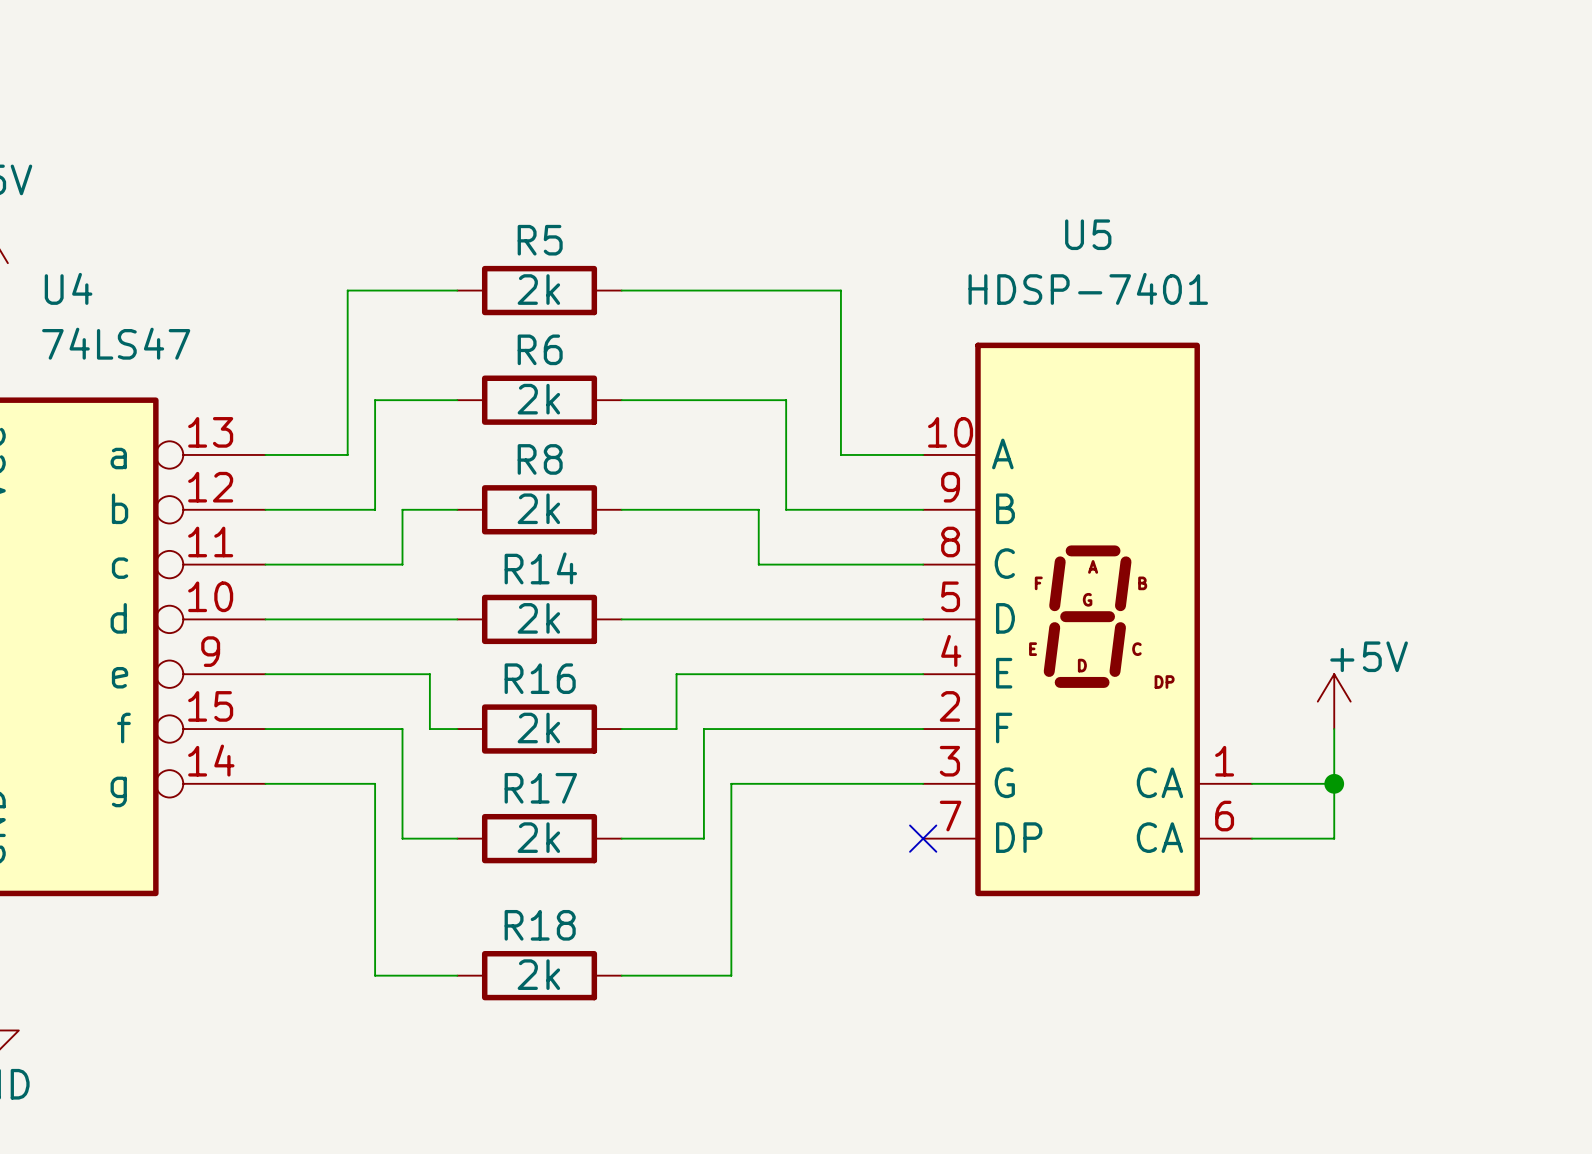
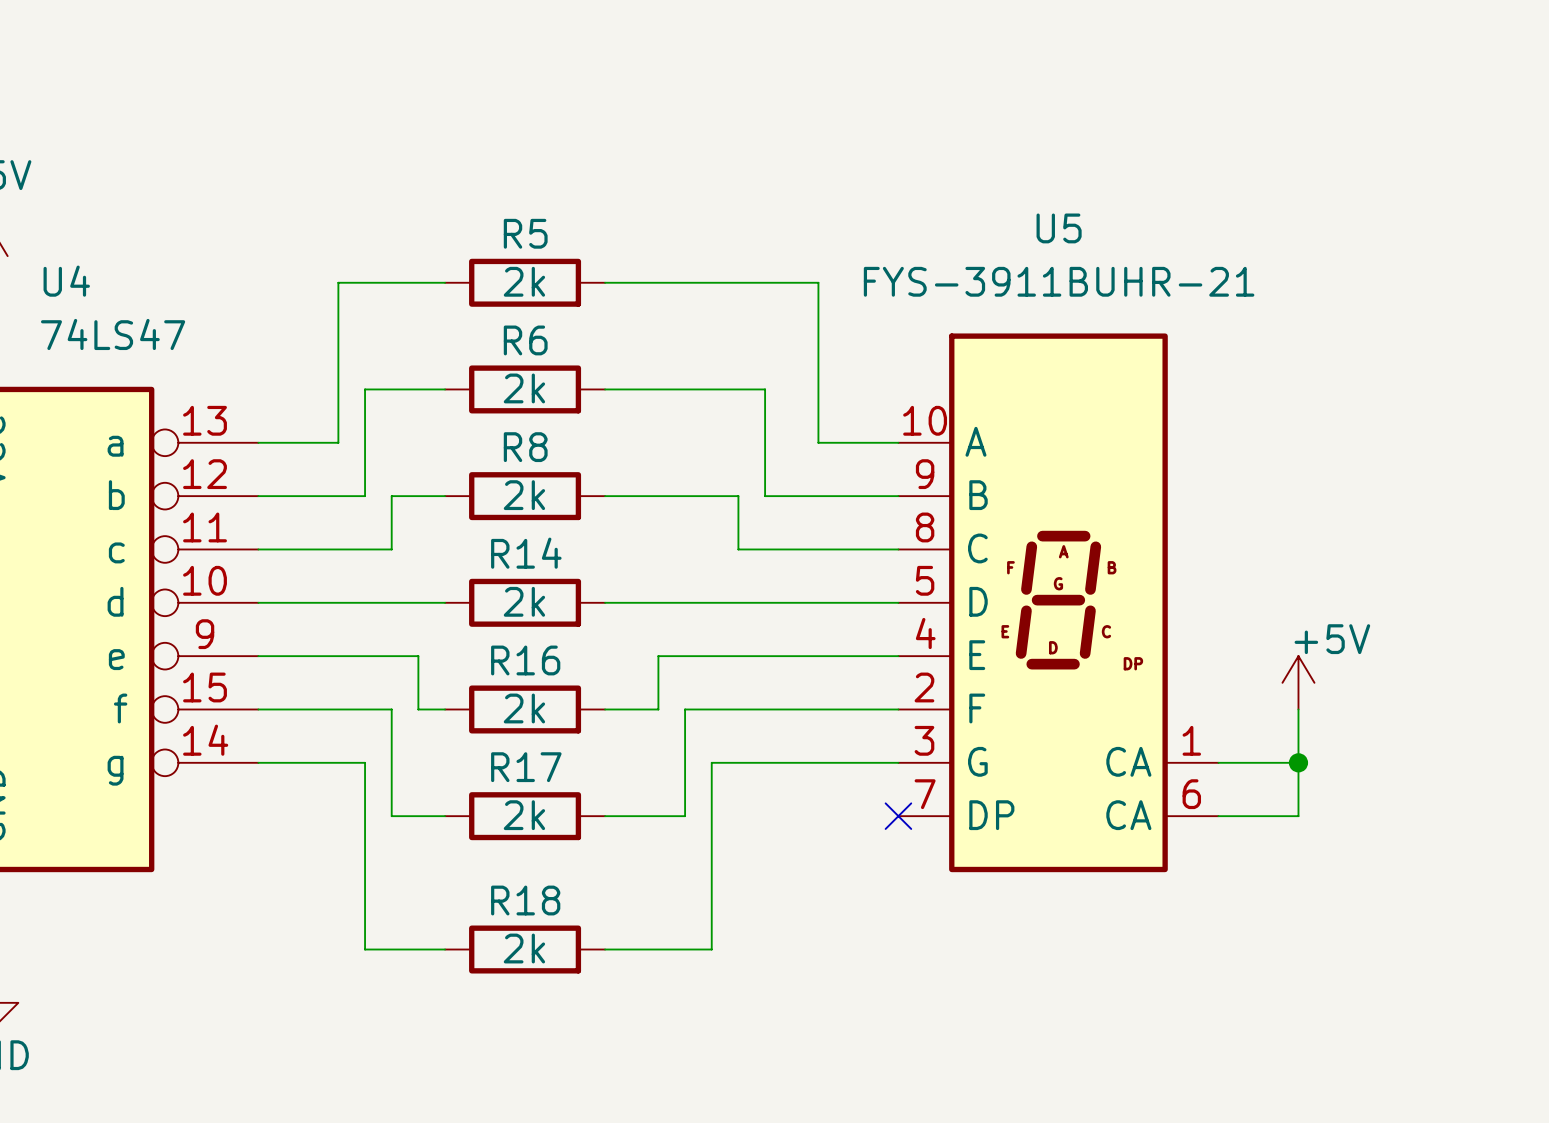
U5 value: HDSP-7401 (1088, 288) -> FYS-3911BUHR-21 (1059, 281)

